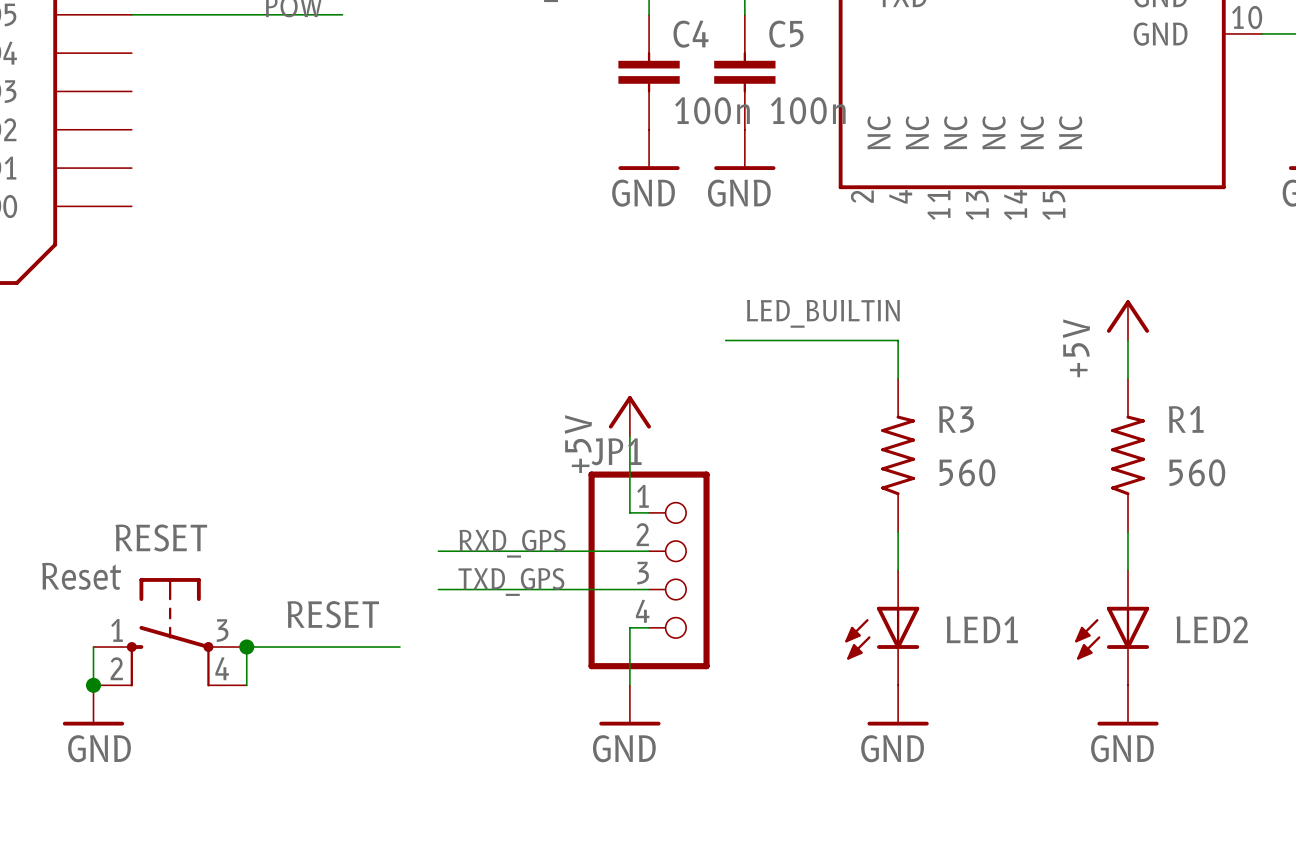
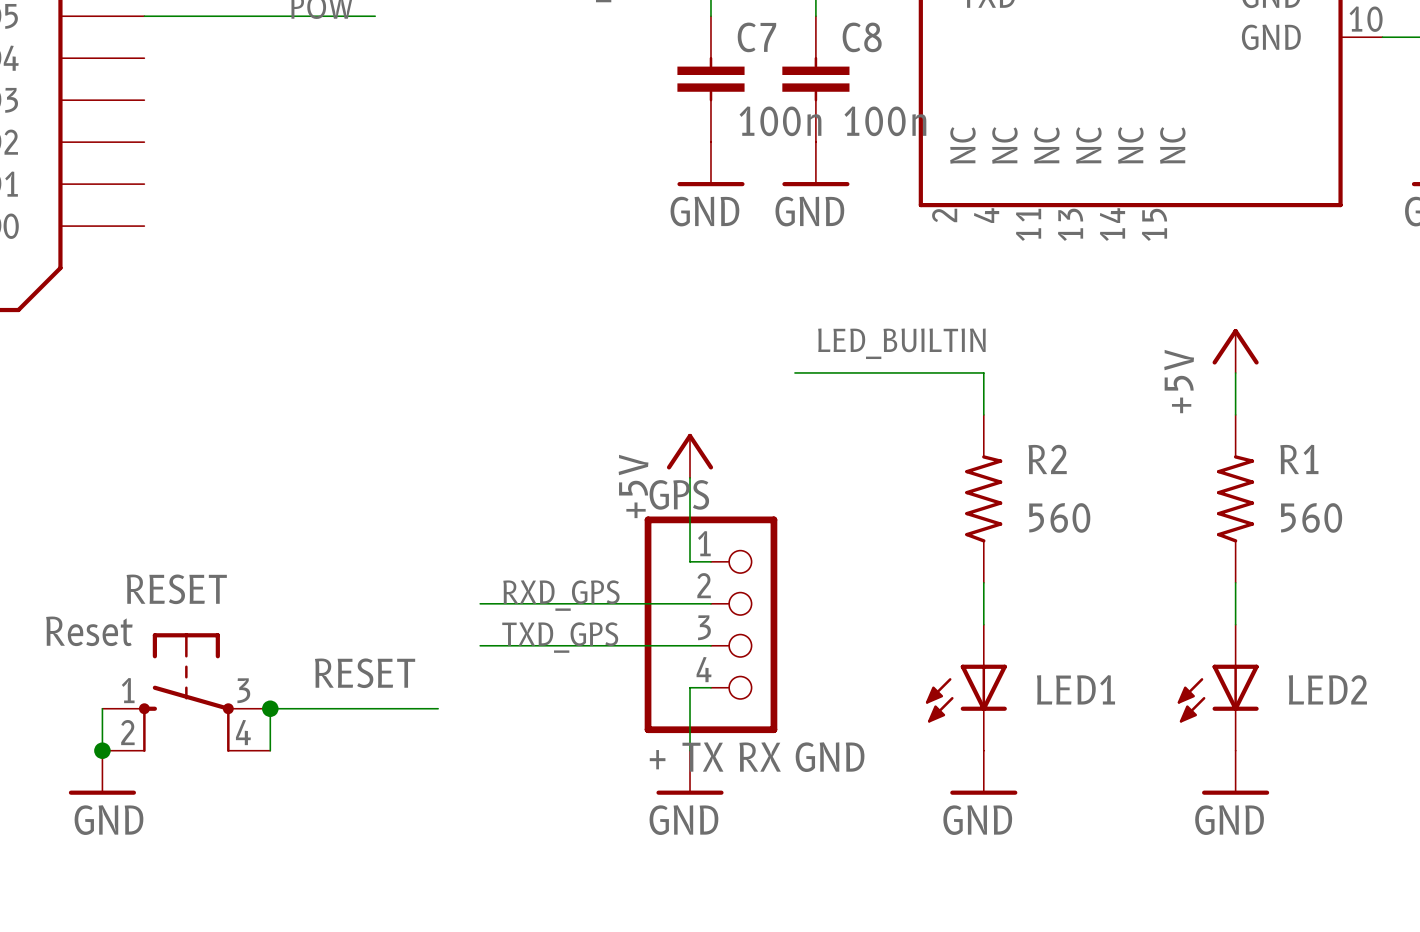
C4 name: C4 (691, 34) -> C7 (756, 37)
C5 name: C5 (786, 34) -> C8 (862, 37)
R3 name: R3 (956, 419) -> R2 (1047, 459)
JP1 name: JP1 (616, 451) -> GPS (679, 494)
JP1 value: none -> + TX RX GND (757, 757)

